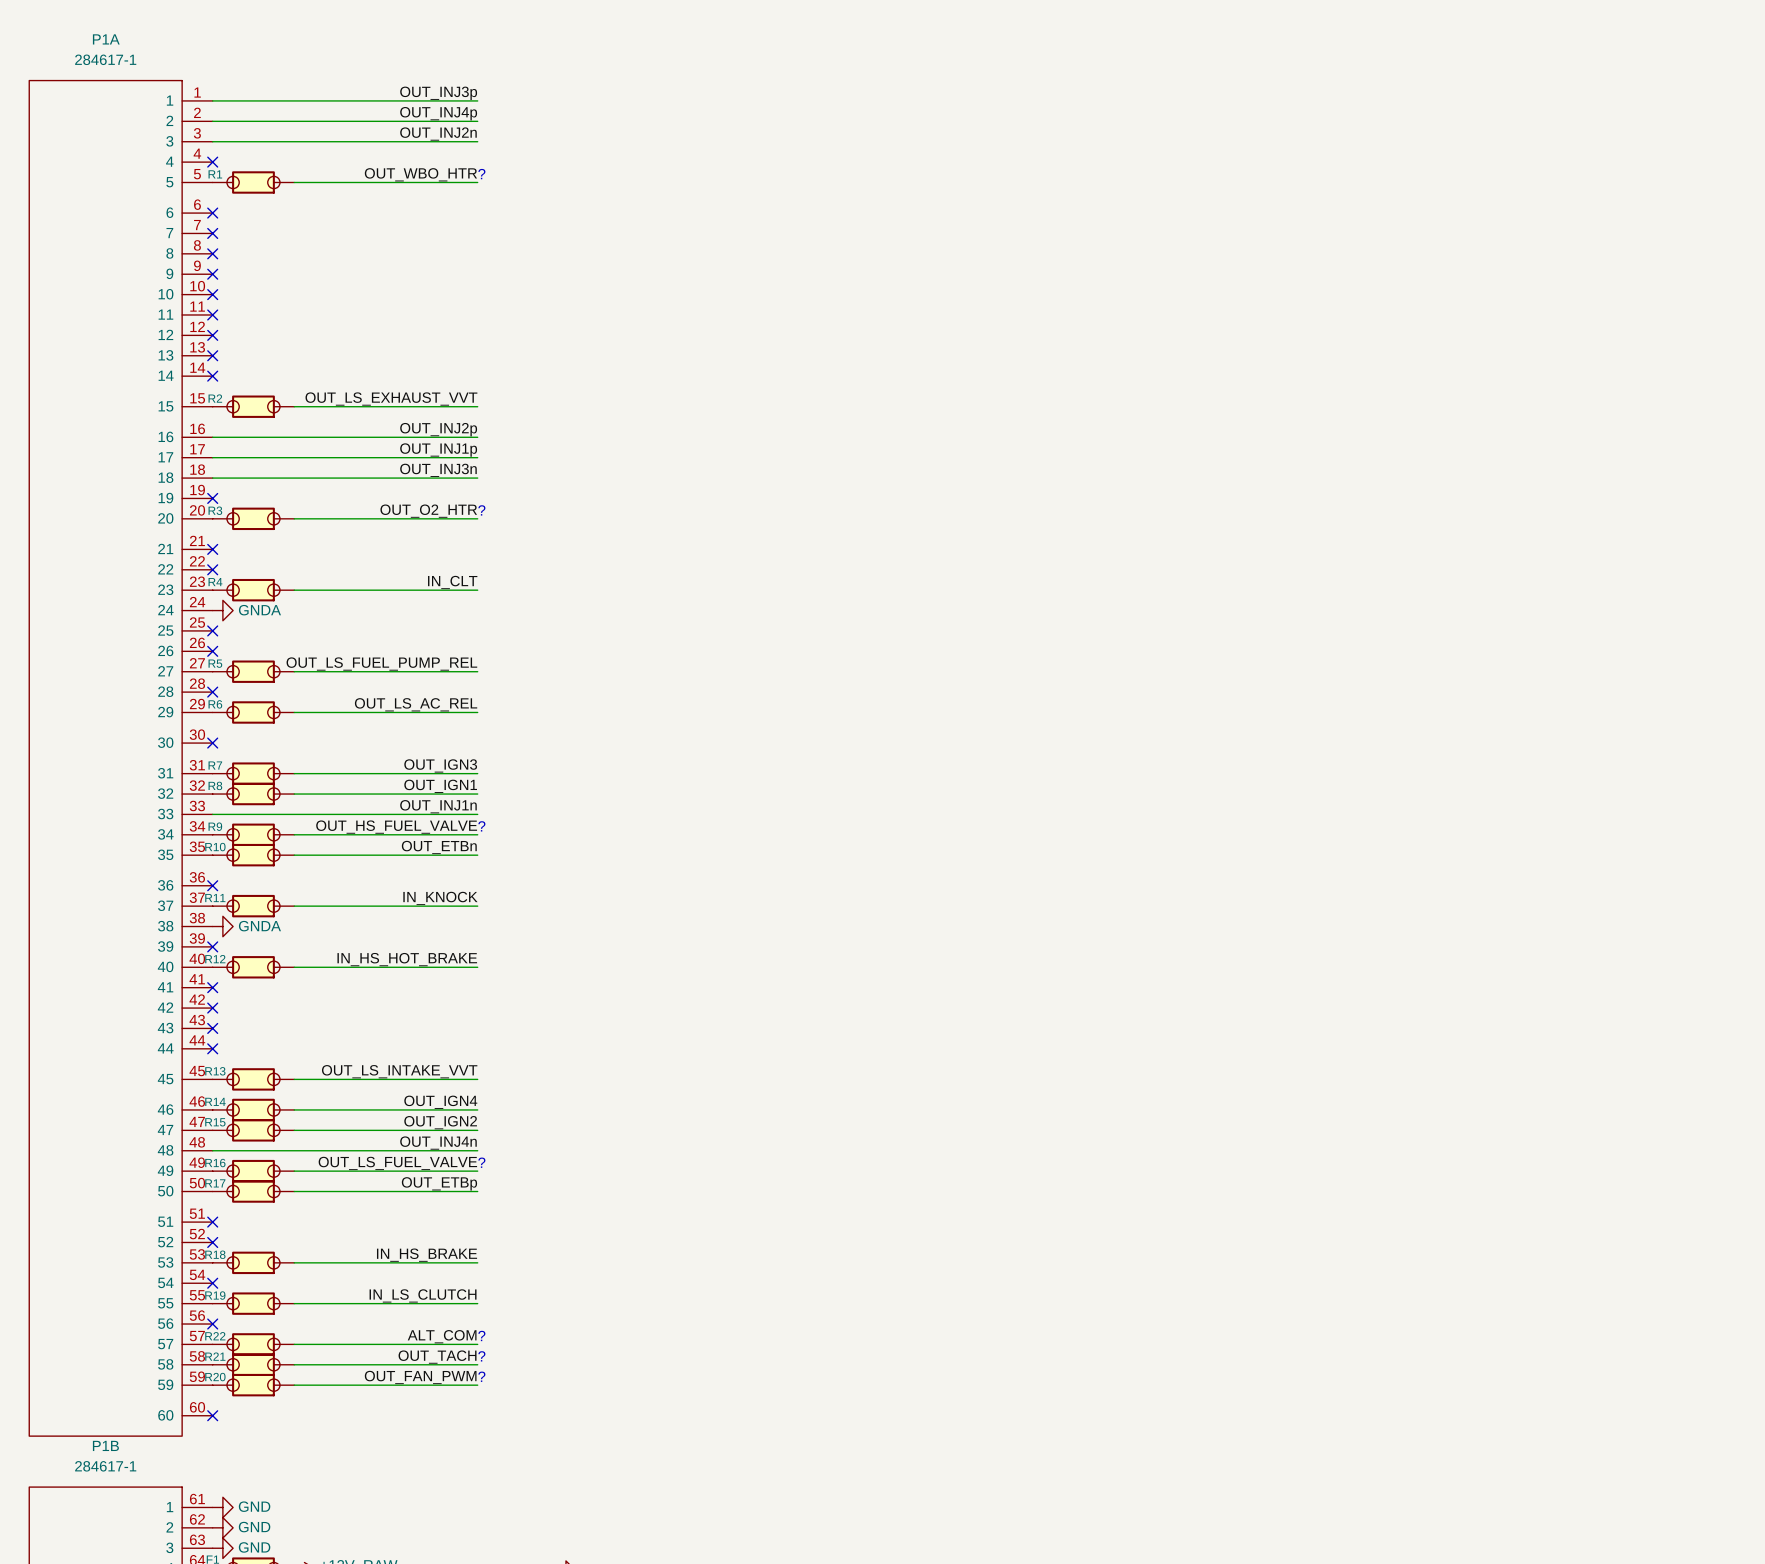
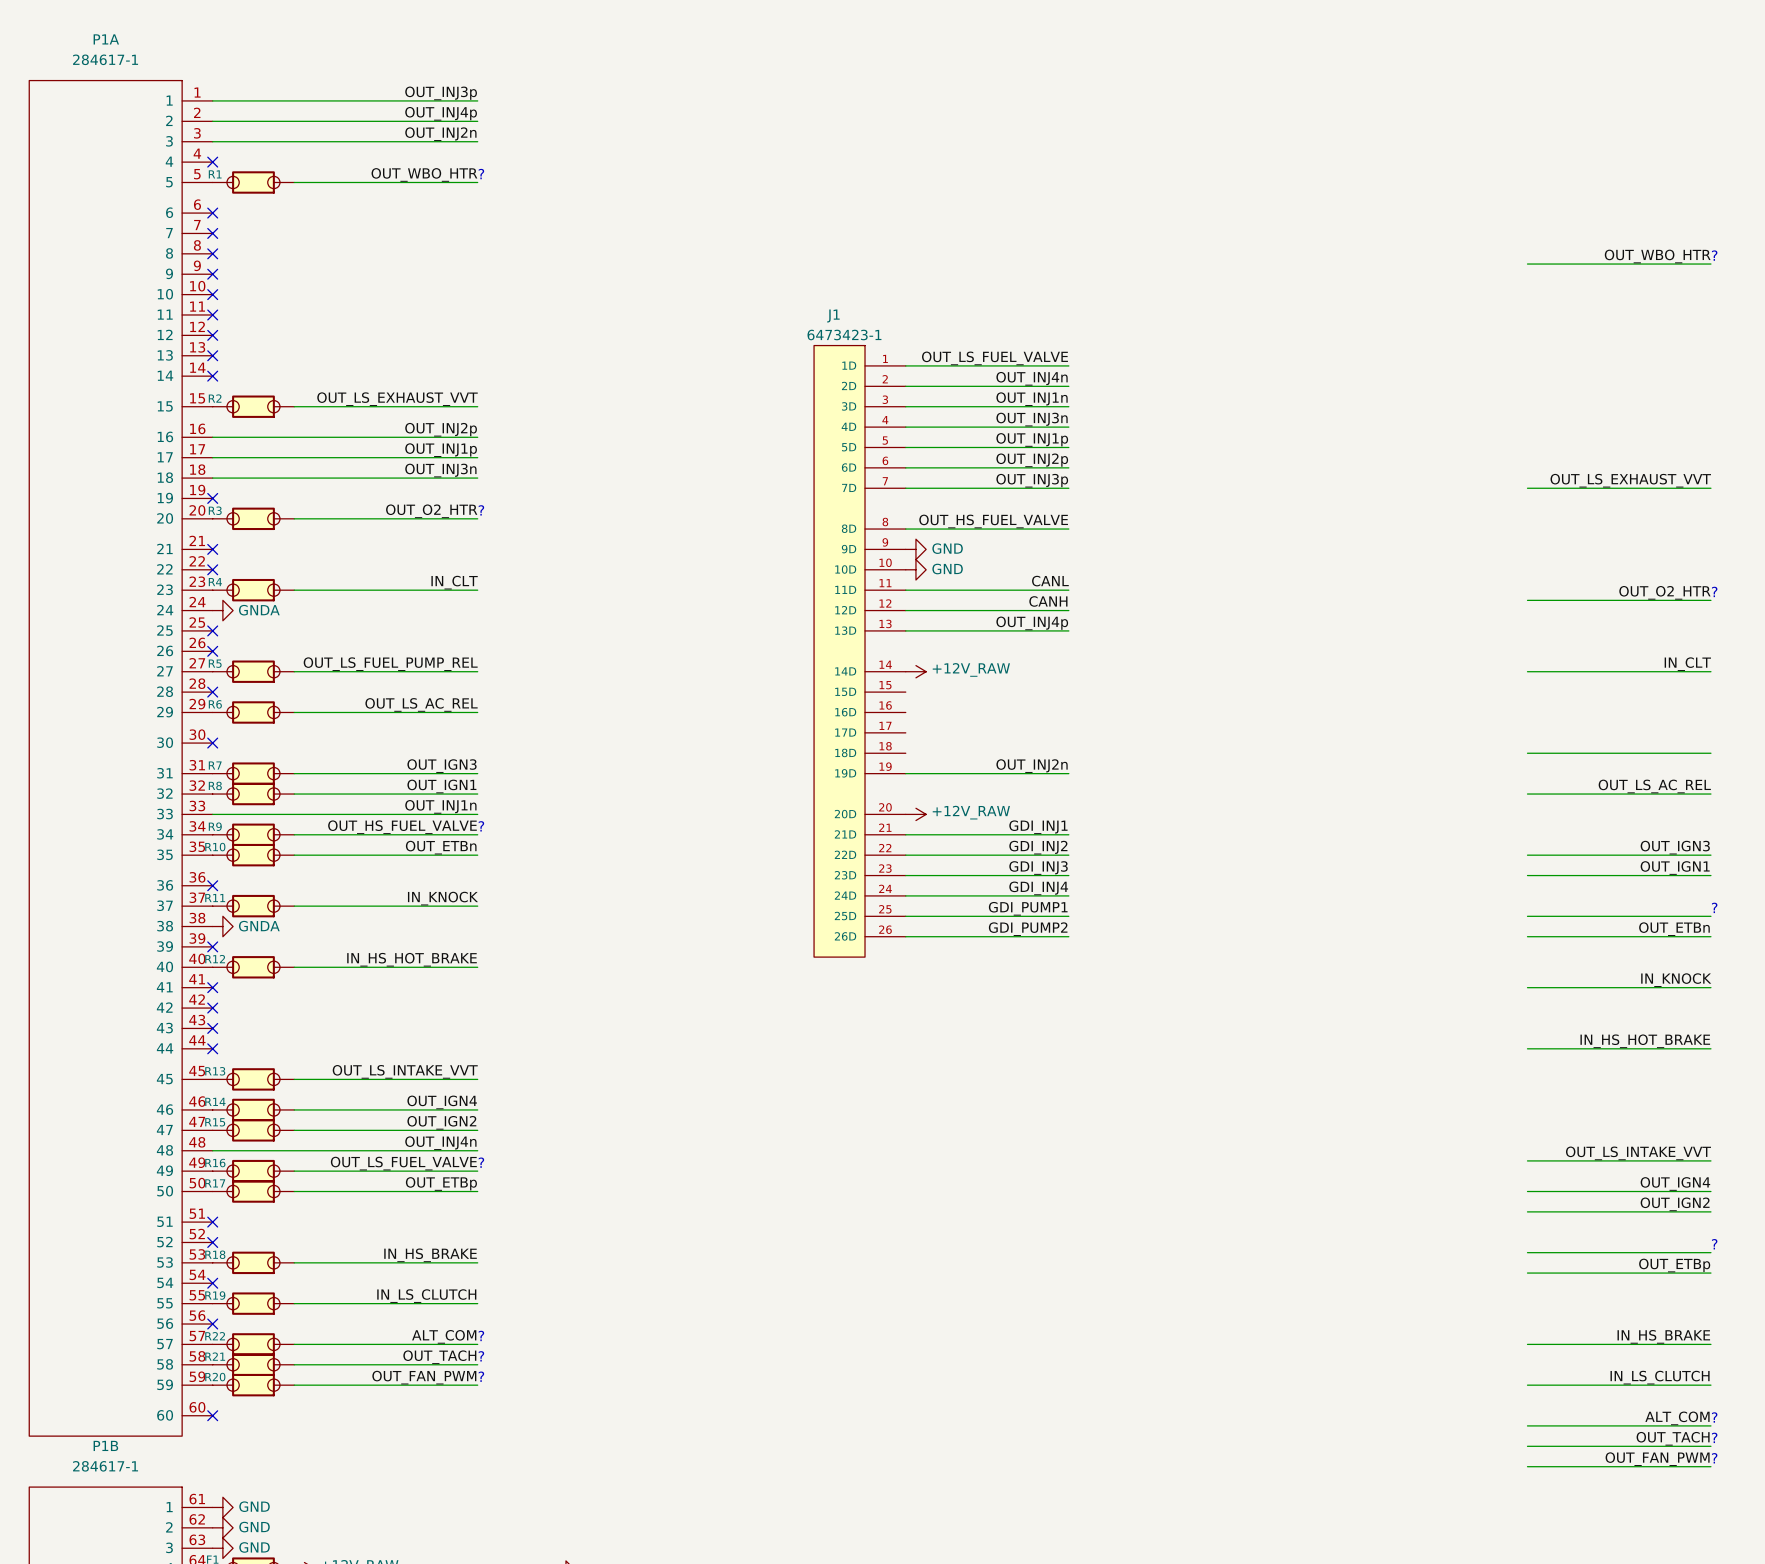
text: none -> ? (1714, 255)
label: none -> OUT_WBO_HTR (1657, 256)
wire: none -> (1527, 264) (1710, 264)
label: none -> OUT_LS_FUEL_VALVE (994, 358)
wire: none -> (905, 365) (1068, 365)
label: none -> OUT_INJ4n (1032, 378)
wire: none -> (905, 386) (1068, 386)
label: none -> OUT_INJ1n (1032, 399)
wire: none -> (905, 406) (1068, 406)
label: none -> OUT_INJ3n (1032, 419)
wire: none -> (905, 427) (1068, 427)
label: none -> OUT_INJ1p (1032, 439)
wire: none -> (905, 447) (1068, 447)
label: none -> OUT_INJ2p (1032, 460)
wire: none -> (905, 467) (1068, 467)
label: none -> OUT_INJ3p (1032, 480)
label: none -> OUT_LS_EXHAUST_VVT (1630, 480)
wire: none -> (905, 488) (1068, 488)
wire: none -> (1527, 488) (1710, 488)
label: none -> OUT_HS_FUEL_VALVE (993, 521)
wire: none -> (905, 529) (1068, 529)
power symbol: none -> GND (915, 549)
power symbol: none -> GND (915, 569)
label: none -> CANL (1050, 581)
wire: none -> (905, 590) (1068, 590)
text: none -> ? (1714, 591)
label: none -> OUT_O2_HTR (1664, 592)
wire: none -> (1527, 600) (1710, 600)
label: none -> CANH (1048, 601)
wire: none -> (905, 610) (1068, 610)
label: none -> OUT_INJ4p (1032, 623)
wire: none -> (905, 630) (1068, 630)
J1: none -> 6473423-1 (859, 651)
label: none -> IN_CLT (1687, 664)
power symbol: none -> +12V_RAW (915, 671)
wire: none -> (1527, 671) (1710, 671)
wire: none -> (1527, 753) (1710, 753)
label: none -> OUT_INJ2n (1032, 766)
wire: none -> (905, 773) (1068, 773)
label: none -> OUT_LS_AC_REL (1654, 786)
wire: none -> (1527, 794) (1710, 794)
power symbol: none -> +12V_RAW (915, 814)
label: none -> GDI_INJ1 (1038, 827)
wire: none -> (905, 834) (1068, 834)
label: none -> GDI_INJ2 (1038, 847)
label: none -> OUT_IGN3 (1675, 847)
wire: none -> (905, 855) (1068, 855)
wire: none -> (1527, 855) (1710, 855)
label: none -> GDI_INJ3 (1038, 868)
label: none -> OUT_IGN1 (1675, 868)
wire: none -> (905, 875) (1068, 875)
wire: none -> (1527, 875) (1710, 875)
label: none -> GDI_INJ4 (1038, 888)
wire: none -> (905, 895) (1068, 895)
text: none -> ? (1714, 907)
label: none -> GDI_PUMP1 (1028, 908)
wire: none -> (905, 916) (1068, 916)
wire: none -> (1527, 916) (1710, 916)
label: none -> GDI_PUMP2 (1028, 929)
label: none -> OUT_ETBn (1674, 929)
wire: none -> (905, 936) (1068, 936)
wire: none -> (1527, 936) (1710, 936)
label: none -> IN_KNOCK (1676, 980)
wire: none -> (1527, 987) (1710, 987)
label: none -> IN_HS_HOT_BRAKE (1645, 1041)
wire: none -> (1527, 1048) (1710, 1048)
label: none -> OUT_LS_INTAKE_VVT (1638, 1153)
wire: none -> (1527, 1160) (1710, 1160)
label: none -> OUT_IGN4 (1675, 1183)
wire: none -> (1527, 1191) (1710, 1191)
label: none -> OUT_IGN2 (1675, 1204)
wire: none -> (1527, 1211) (1710, 1211)
text: none -> ? (1714, 1244)
wire: none -> (1527, 1252) (1710, 1252)
label: none -> OUT_ETBp (1674, 1265)
wire: none -> (1527, 1273) (1710, 1273)
label: none -> IN_HS_BRAKE (1663, 1336)
wire: none -> (1527, 1344) (1710, 1344)
label: none -> IN_LS_CLUTCH (1660, 1377)
wire: none -> (1527, 1385) (1710, 1385)
text: none -> ? (1714, 1417)
label: none -> ALT_COM (1677, 1418)
wire: none -> (1527, 1425) (1710, 1425)
text: none -> ? (1714, 1437)
label: none -> OUT_TACH (1673, 1438)
wire: none -> (1527, 1446) (1710, 1446)
text: none -> ? (1714, 1458)
label: none -> OUT_FAN_PWM (1657, 1459)
wire: none -> (1527, 1466) (1710, 1466)

